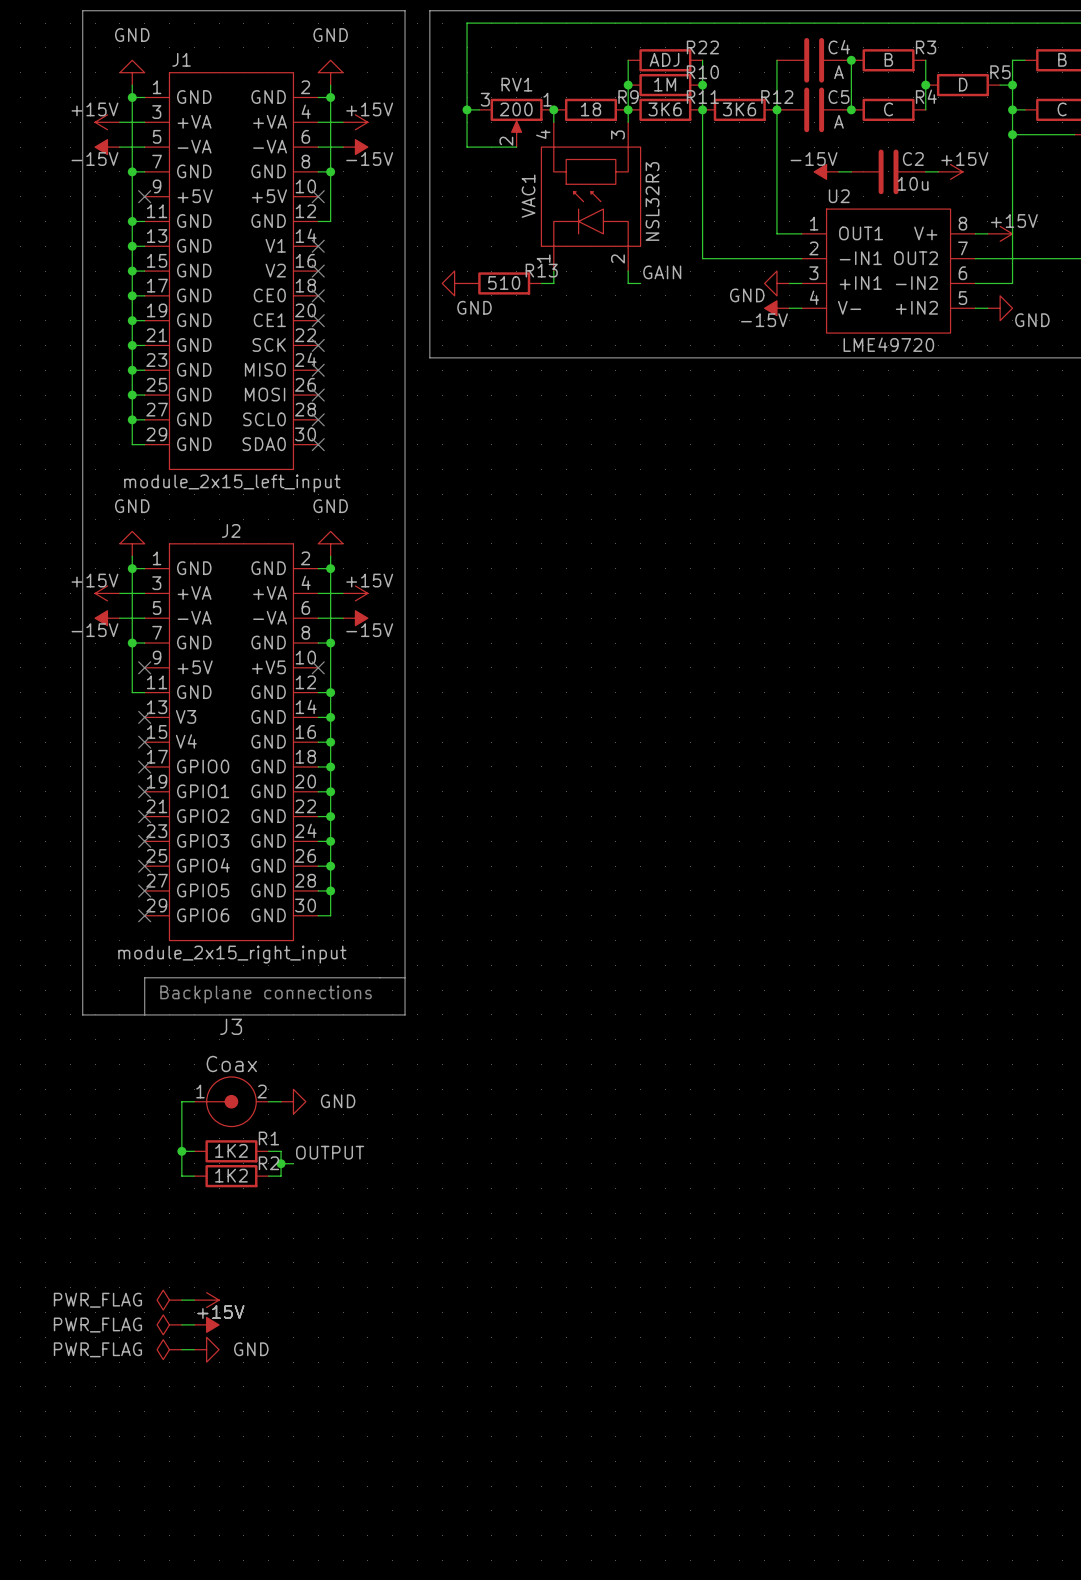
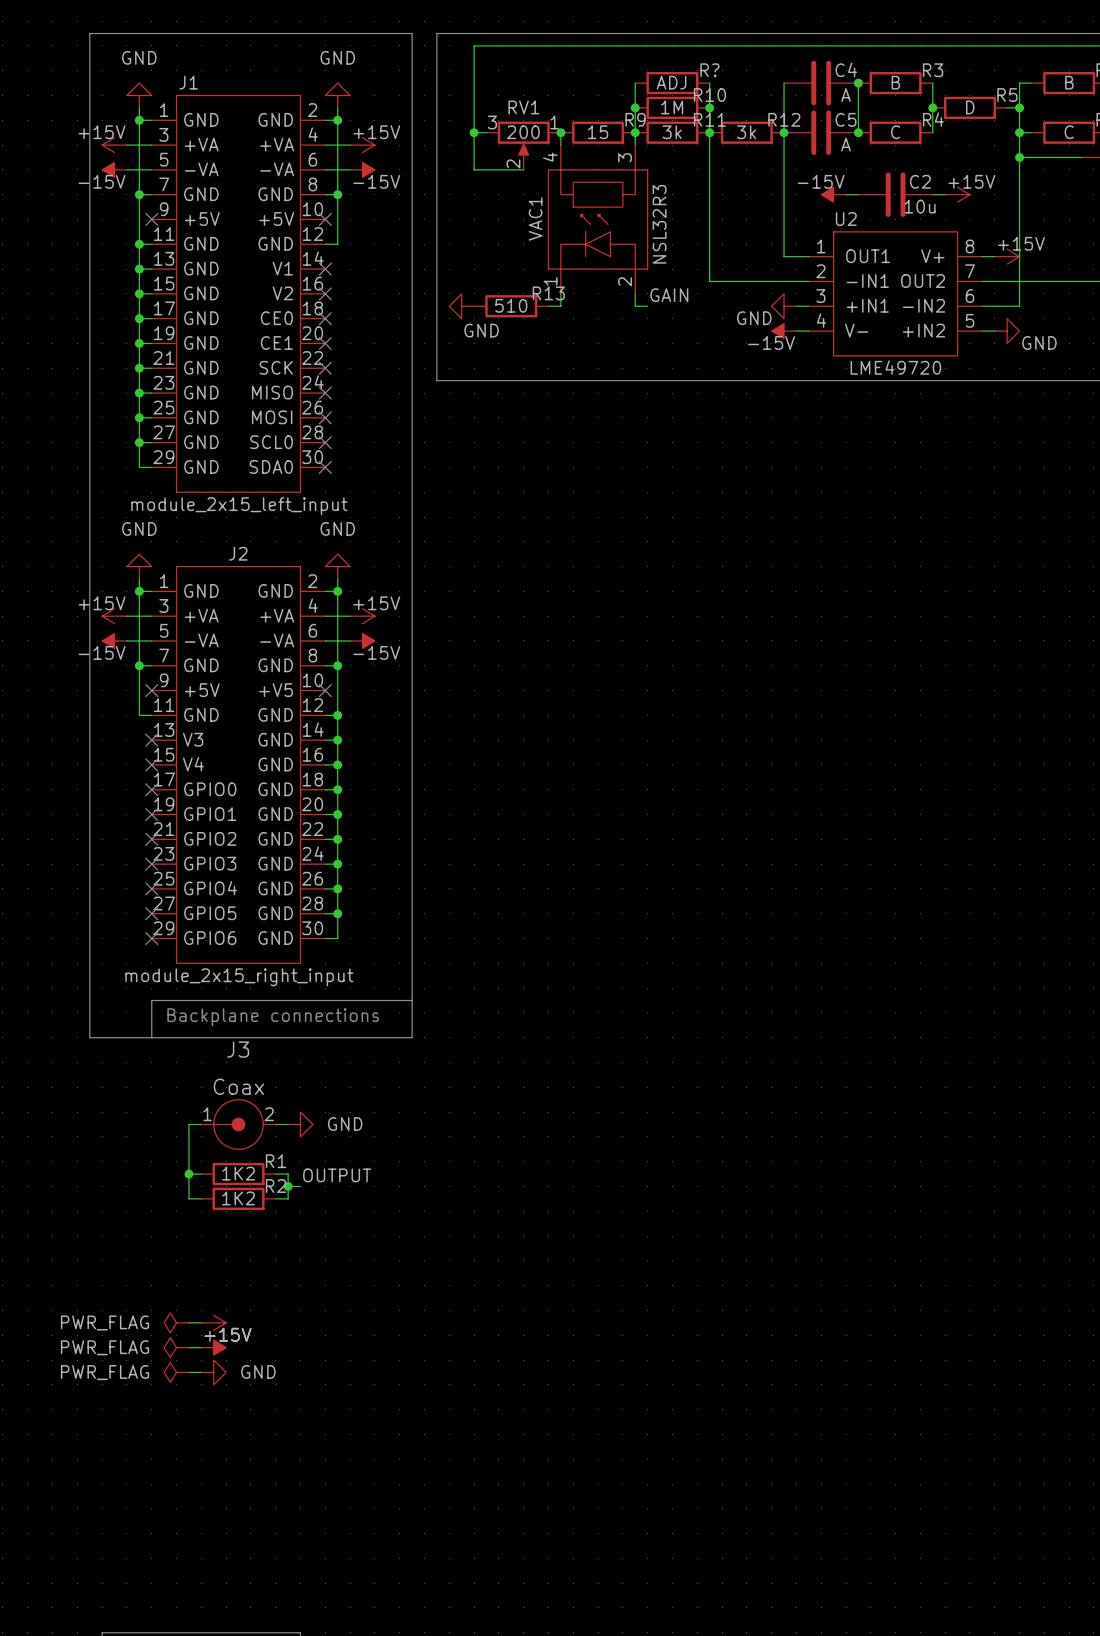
R22 name: R22 (702, 47) -> R? (709, 70)
R9 value: 18 (591, 109) -> 15 (598, 132)
R11 value: 3K6 (665, 109) -> 3k (672, 132)
R12 value: 3K6 (739, 109) -> 3k (746, 132)

